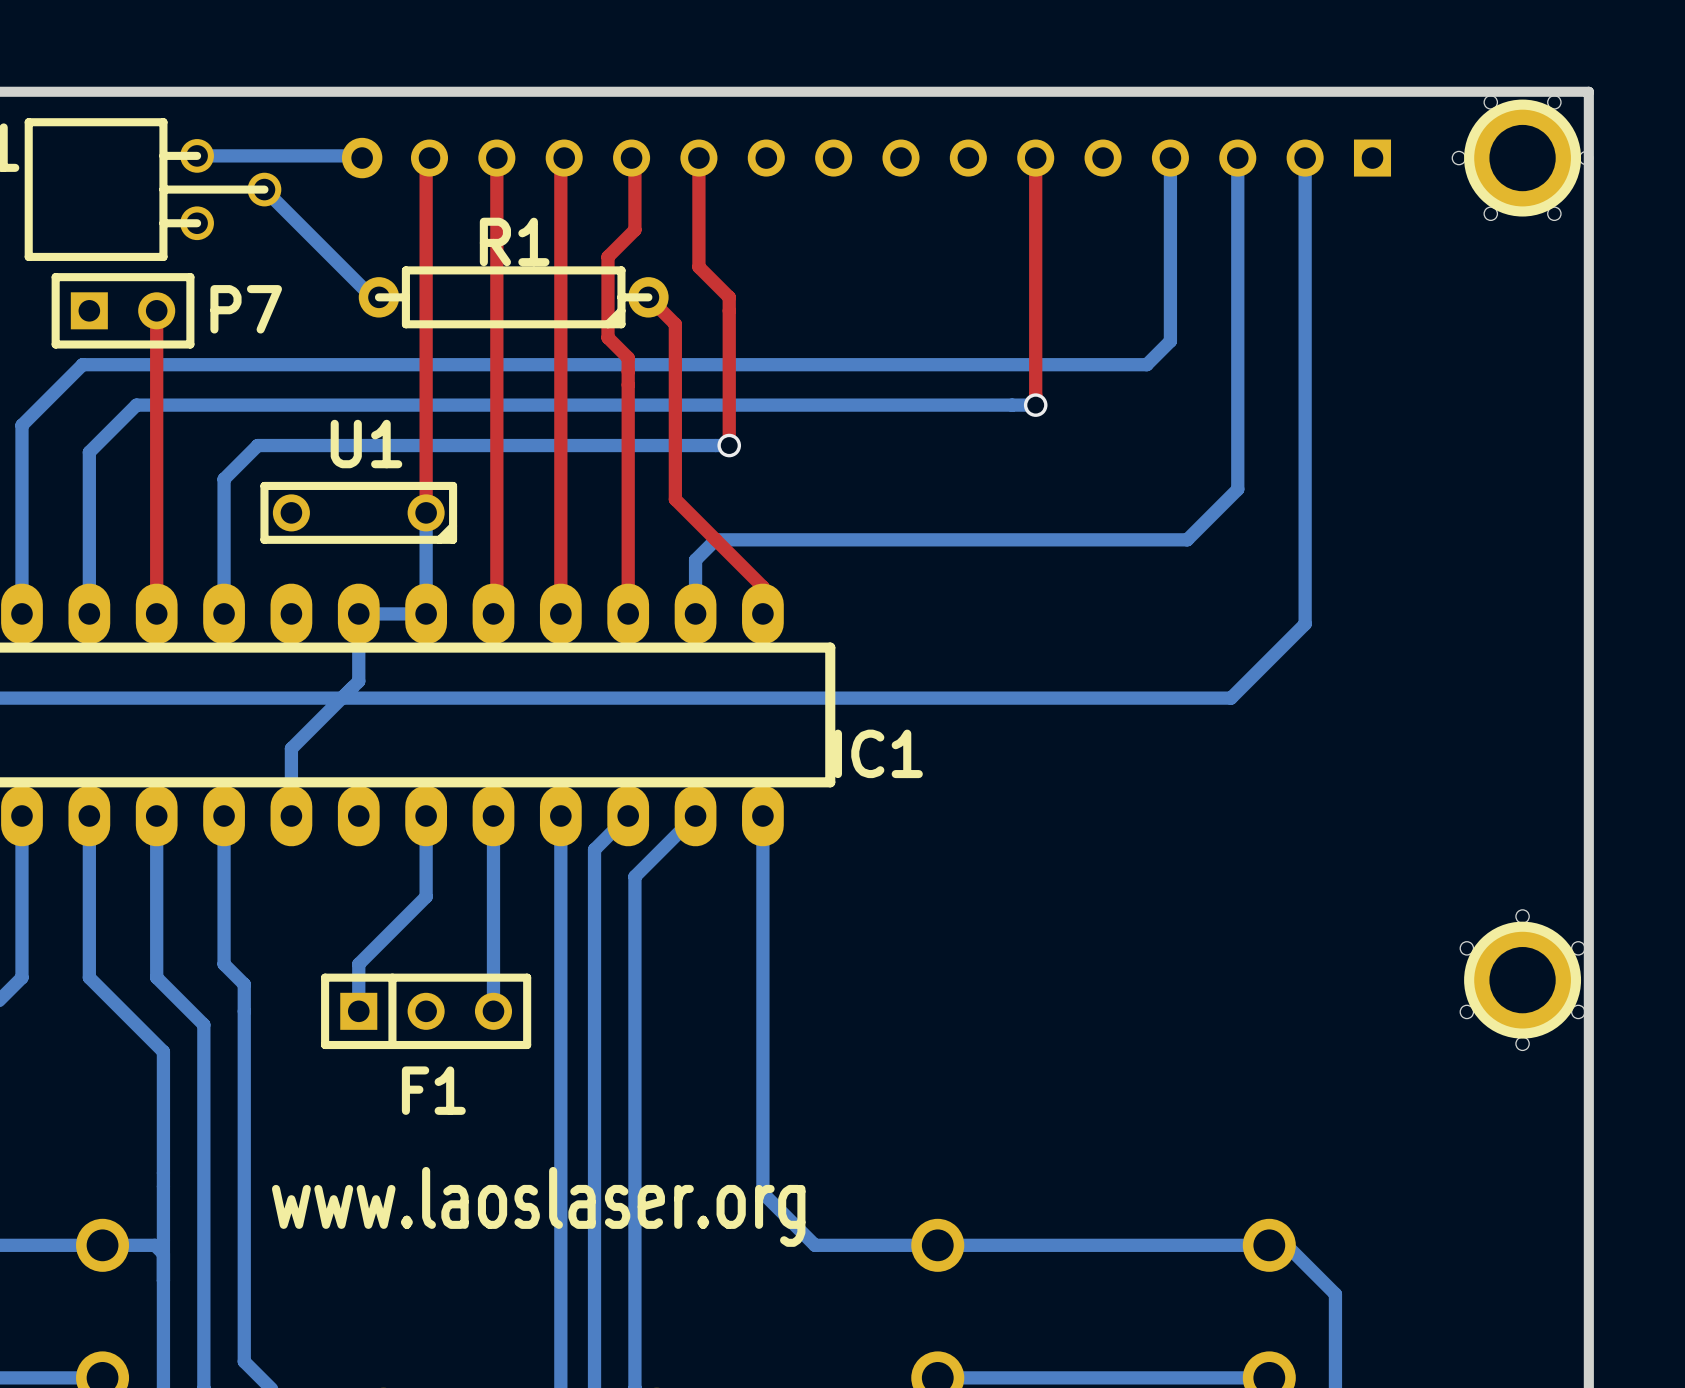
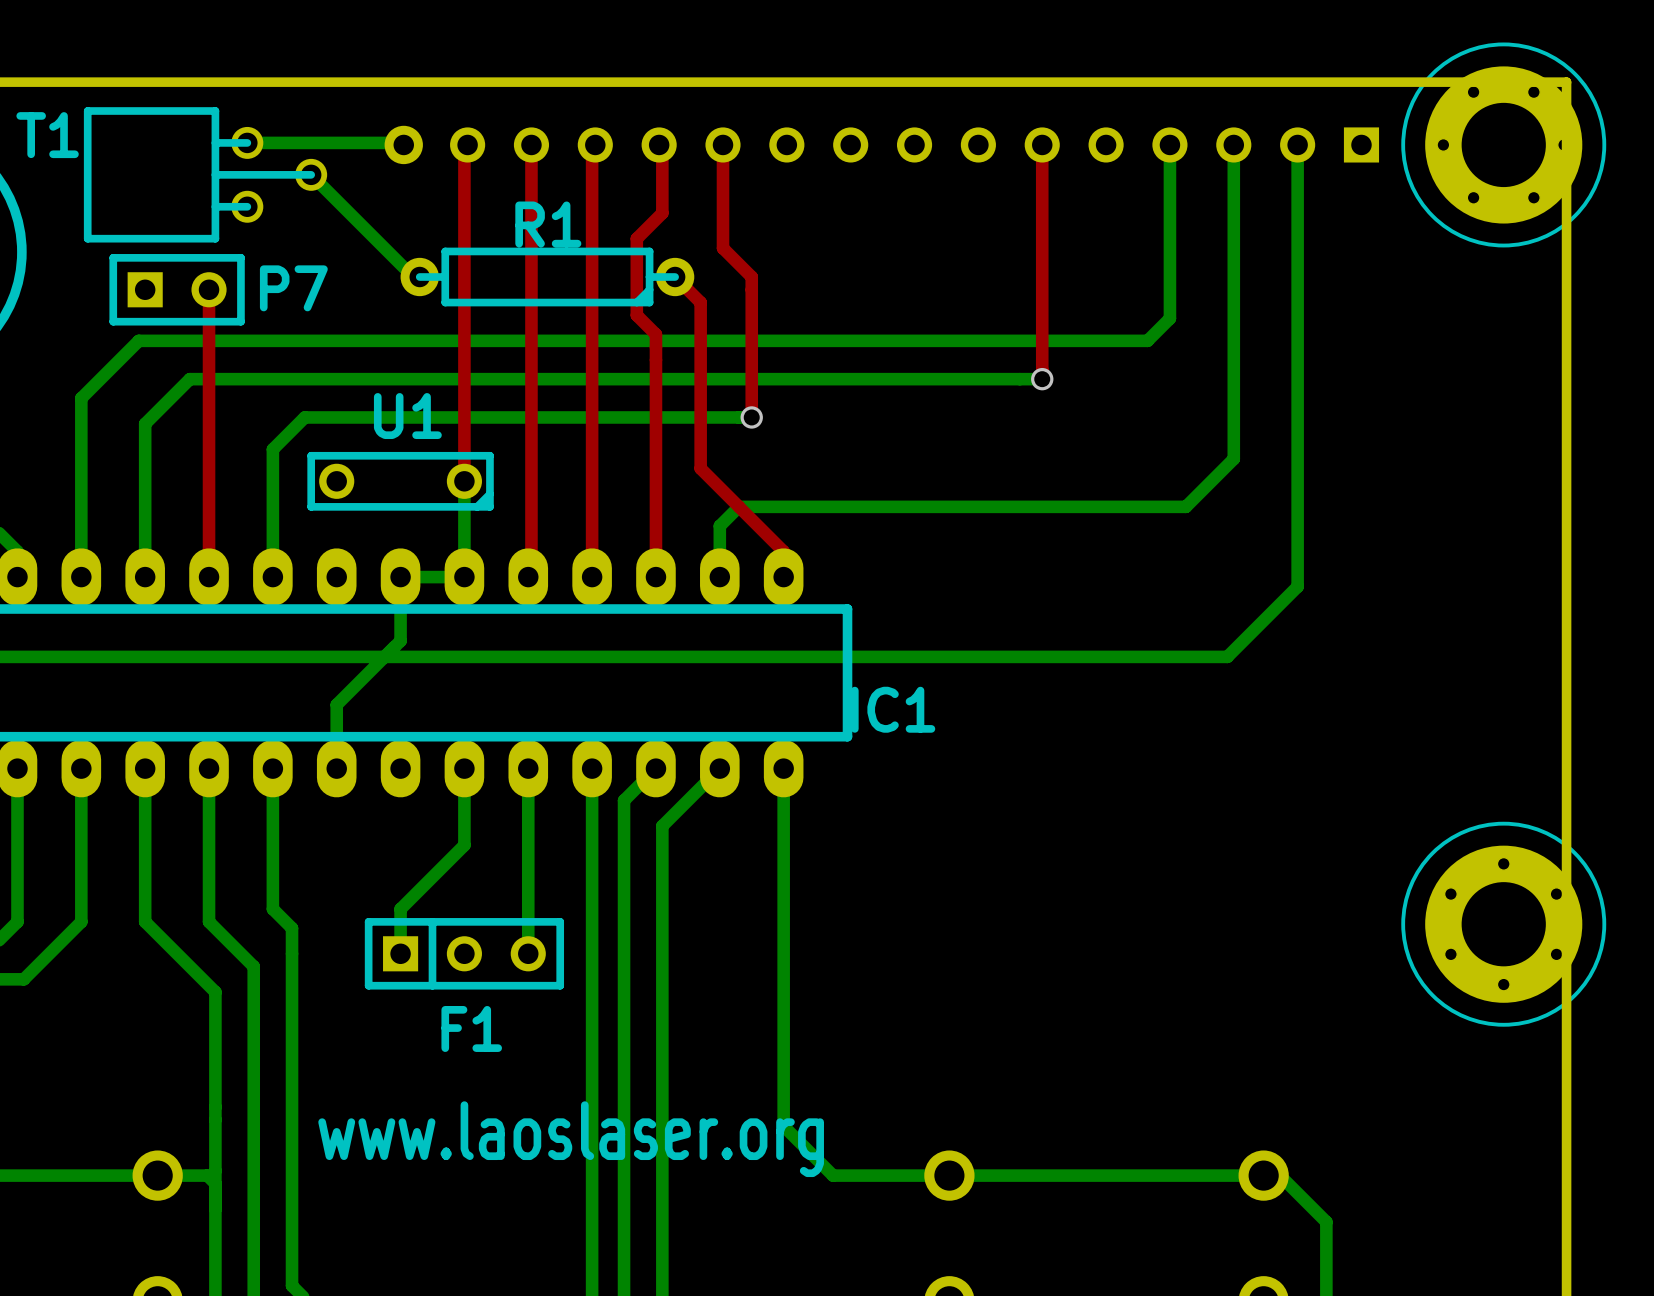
part footprint: [1452, 95, 1593, 221] -> [1401, 42, 1607, 248]
part footprint: [1460, 909, 1585, 1051] -> [1401, 821, 1607, 1027]

